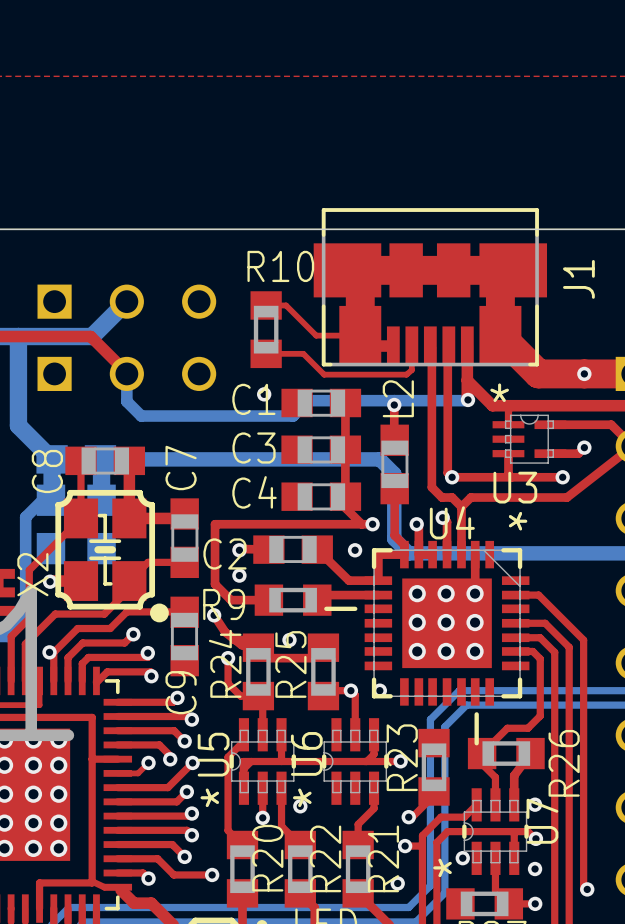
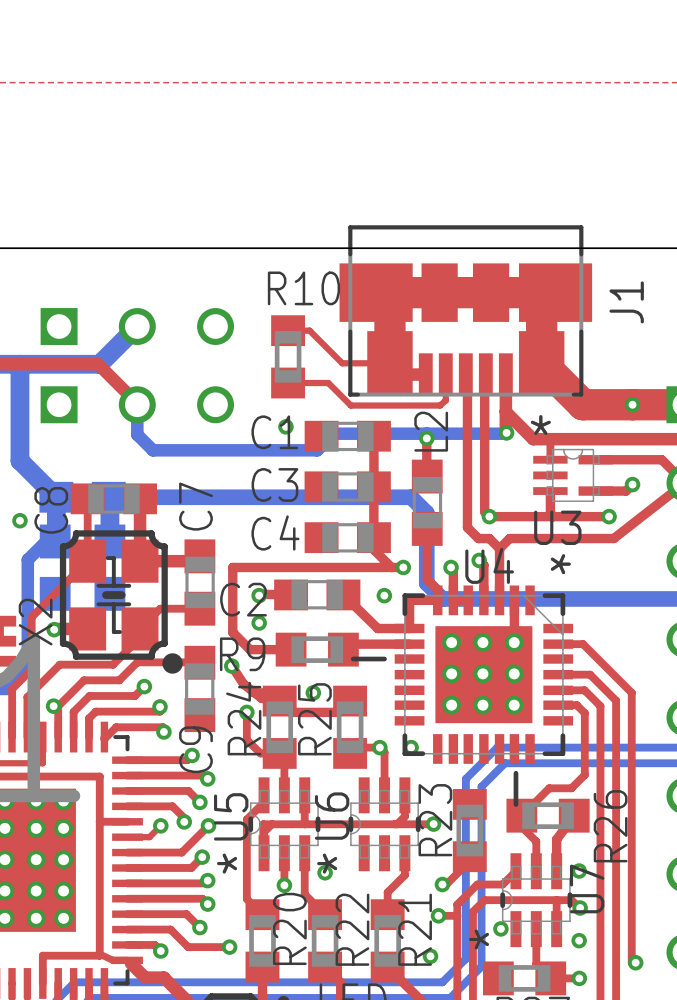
via: none -> (19, 520)

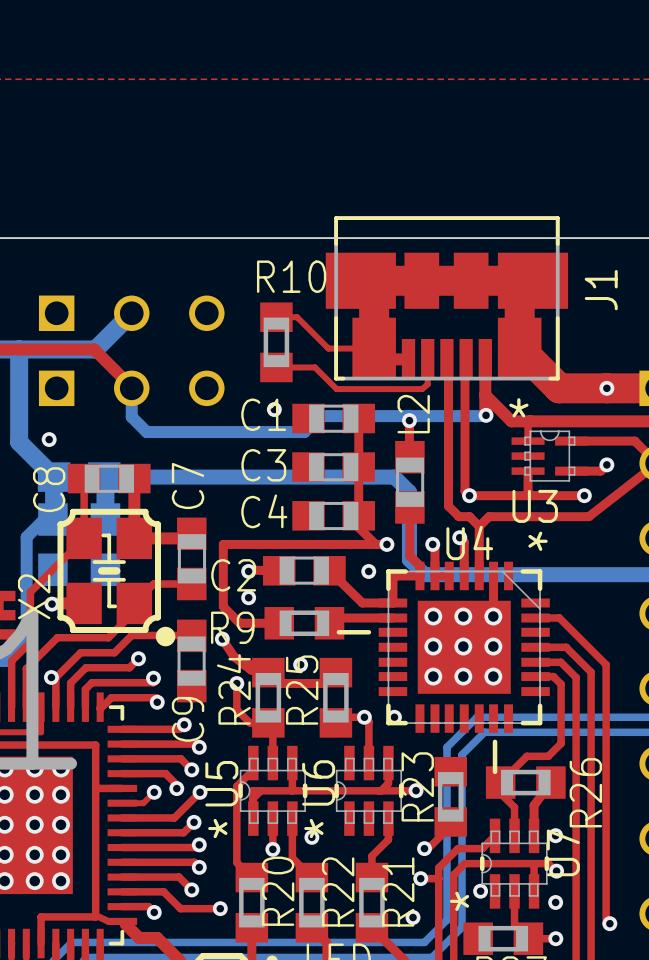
via: none -> (49, 439)
via: (19, 520) -> none

